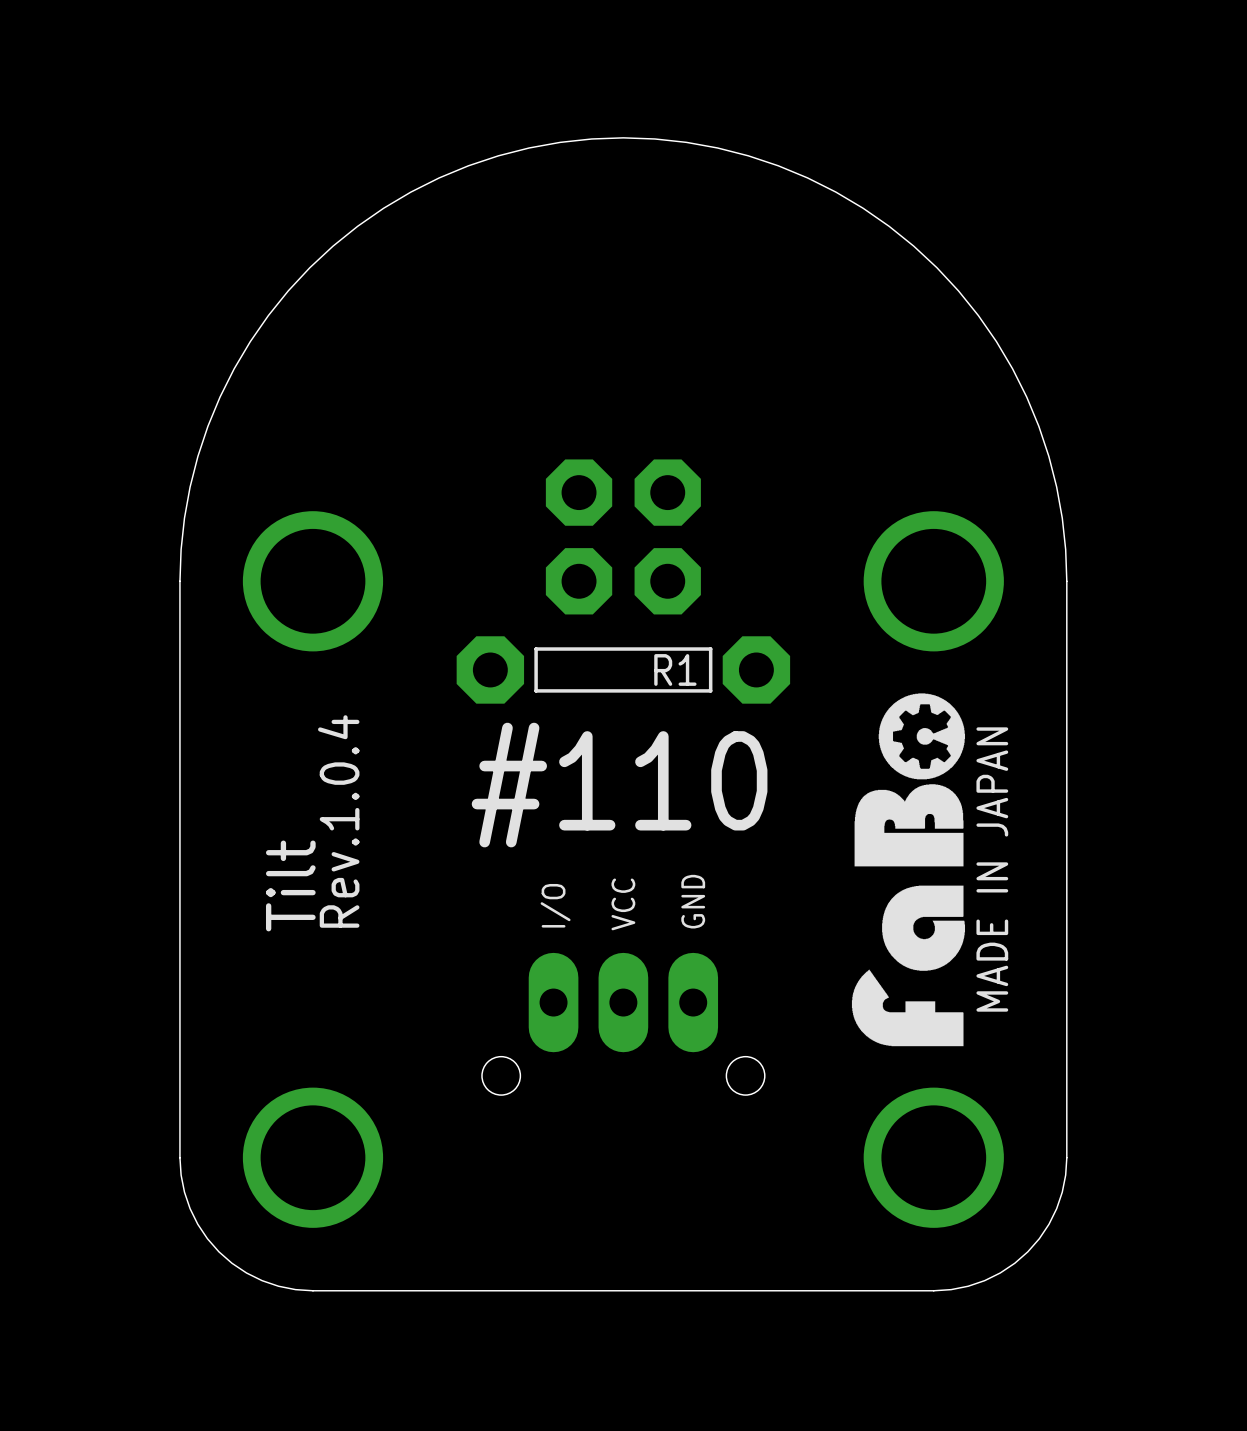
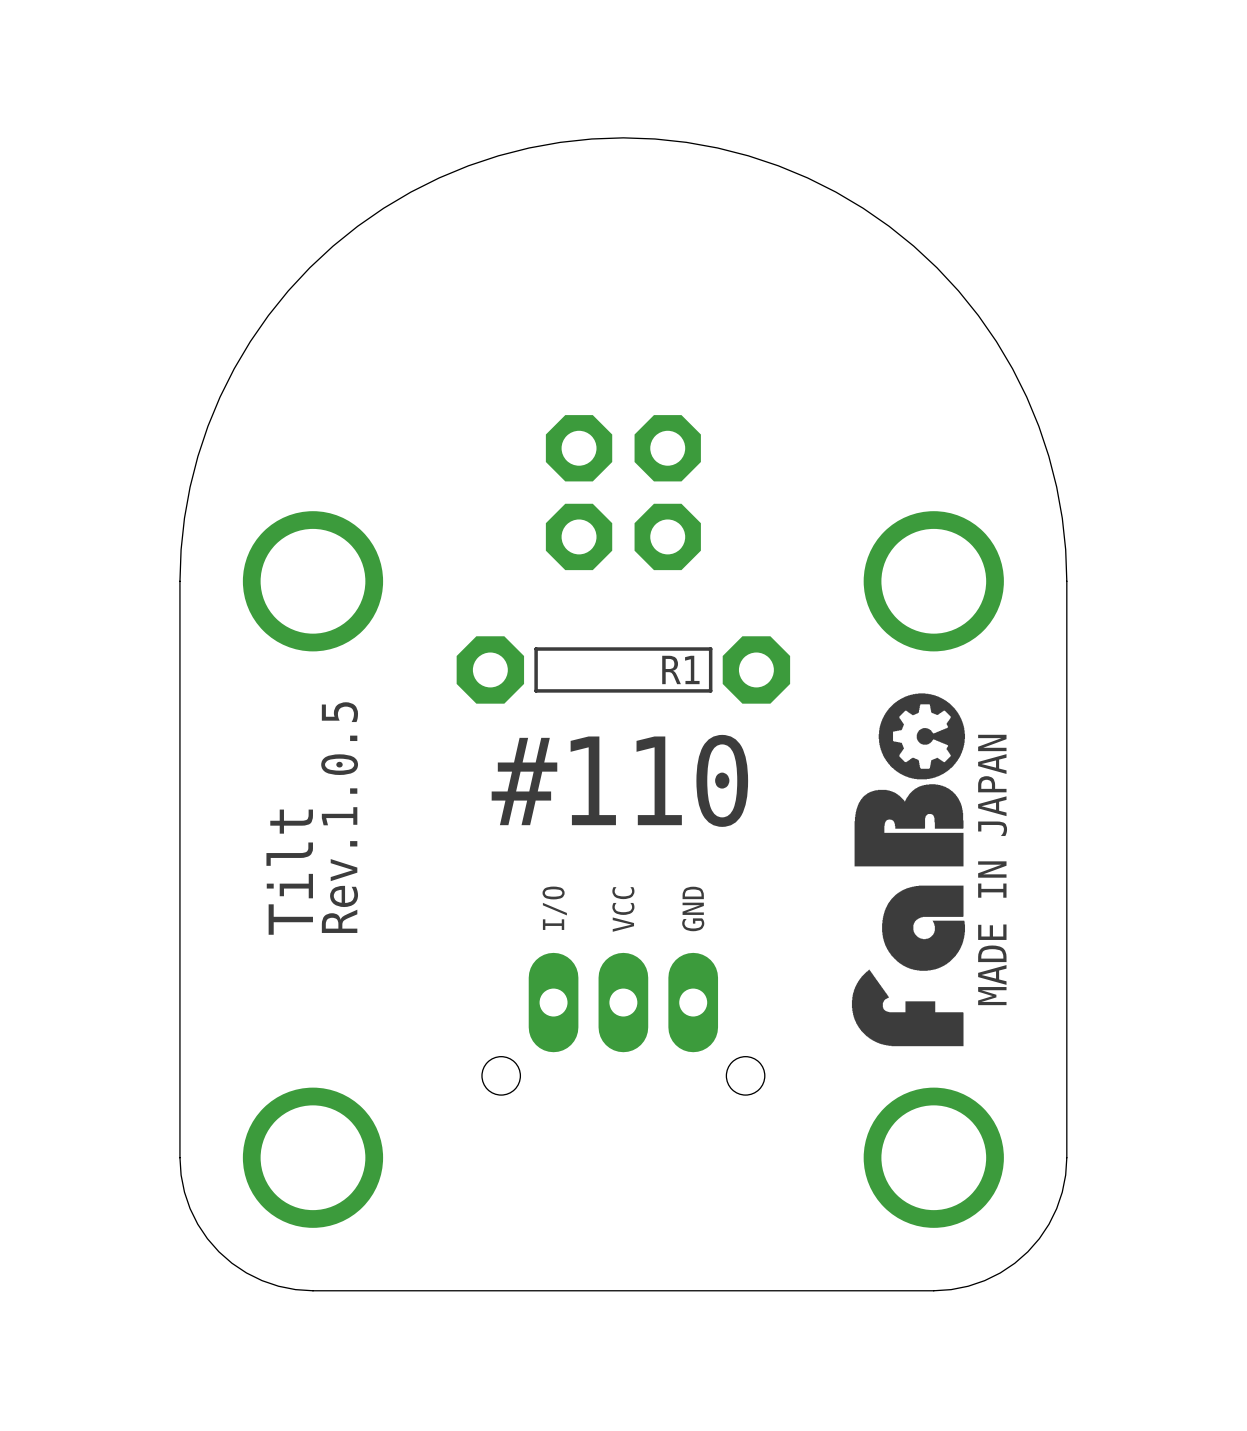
part position: (623, 536) -> (623, 492)
text: Rev.1.0.4 (338, 821) -> Rev.1.0.5 (339, 817)

